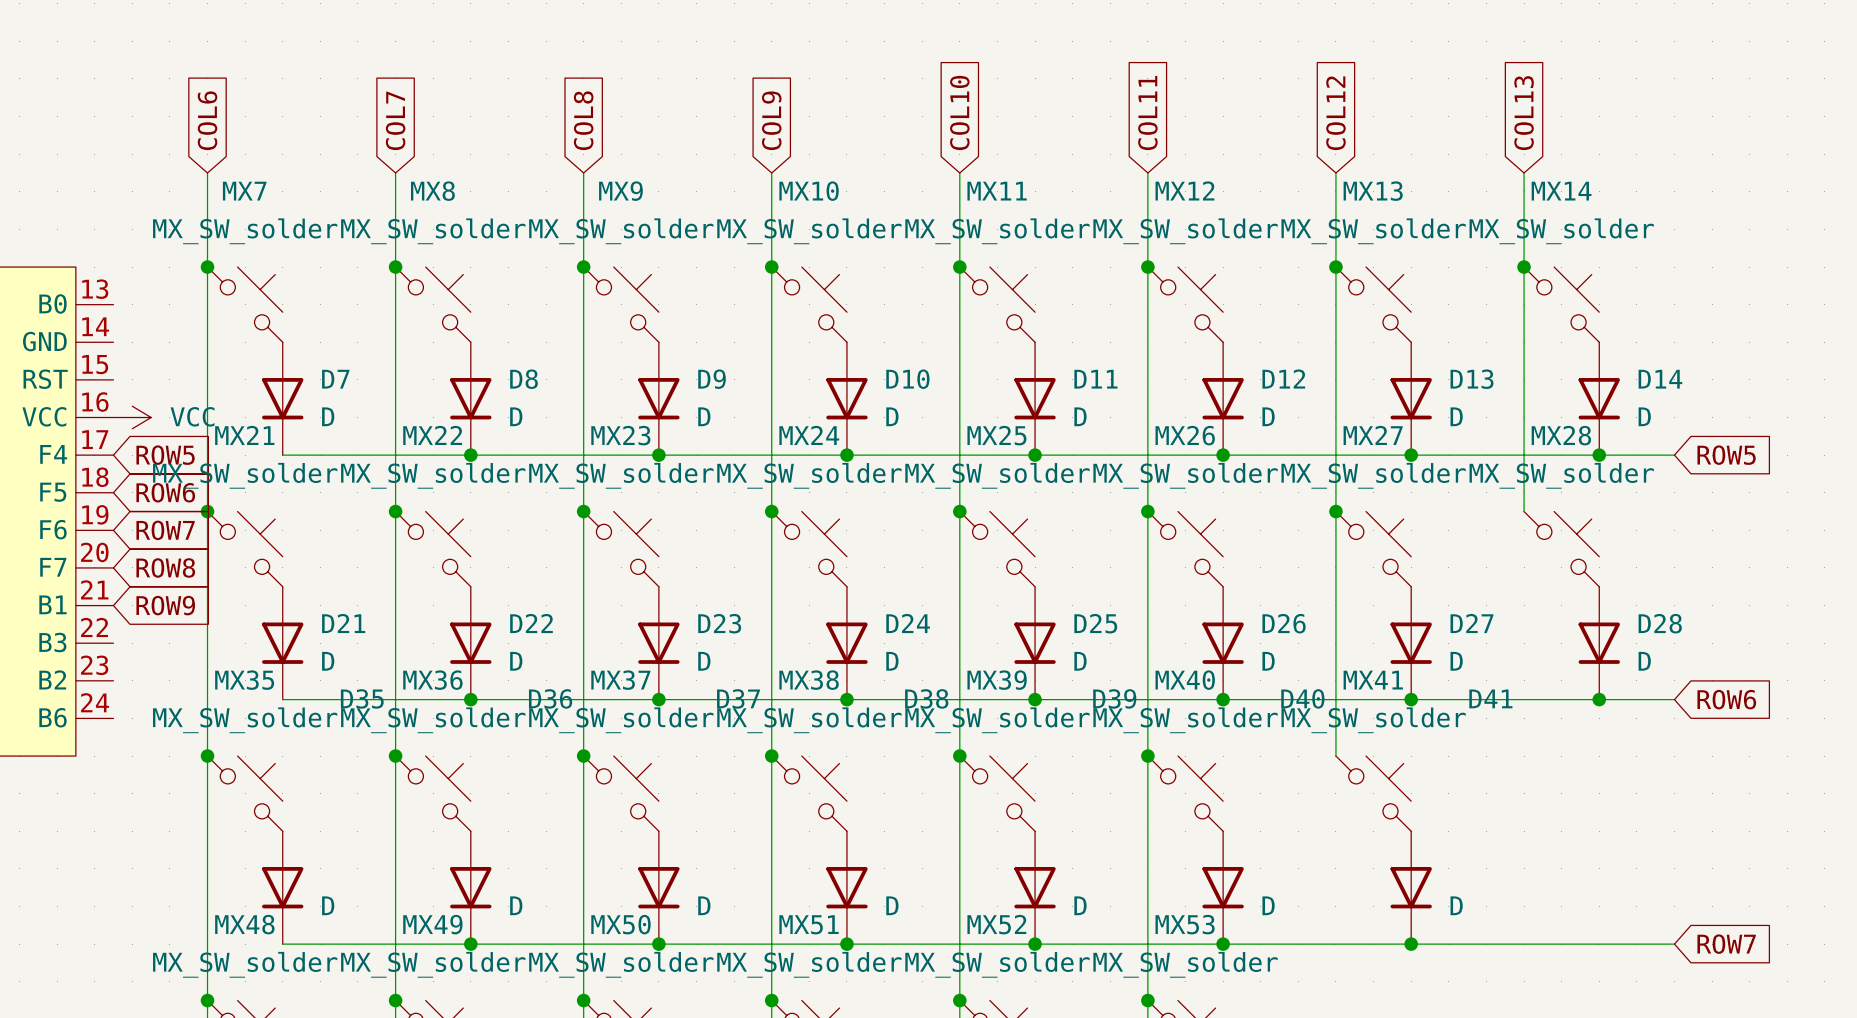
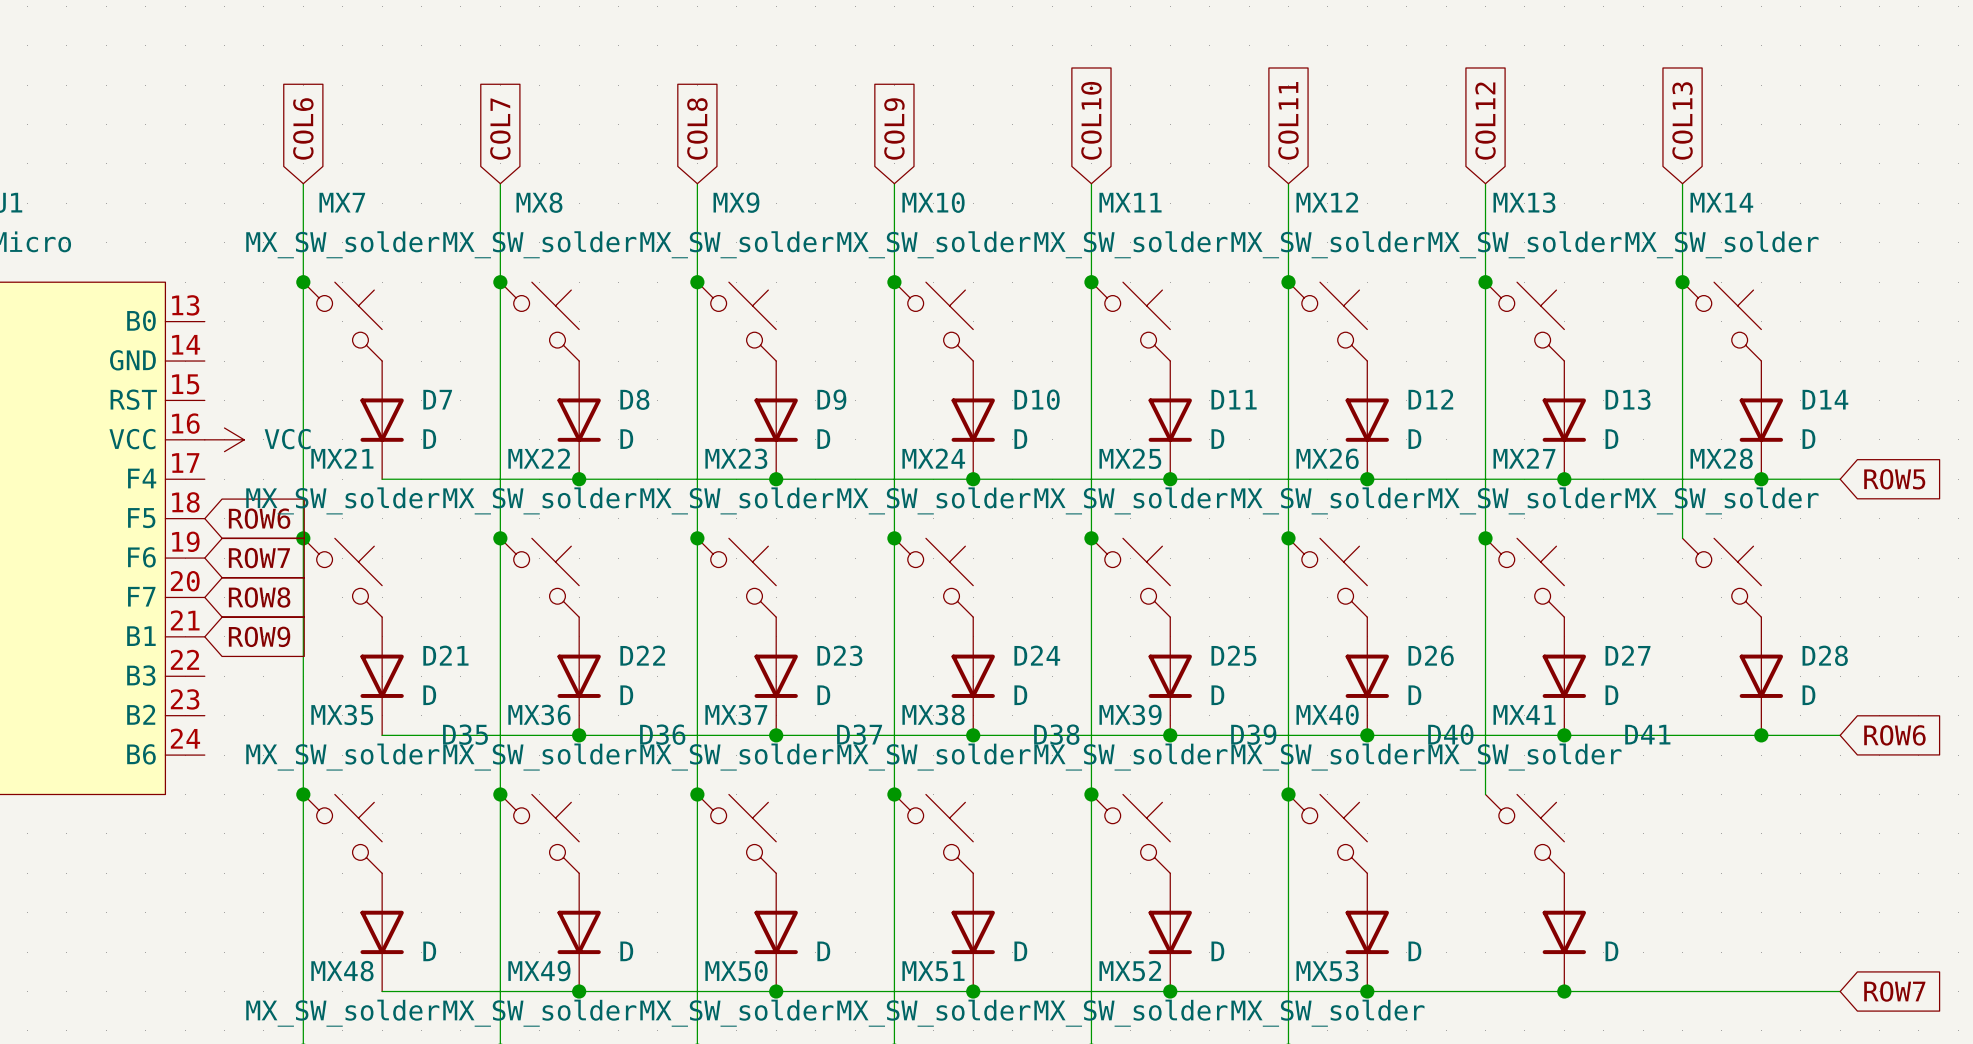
global label: ROW5 (165, 455) -> none

